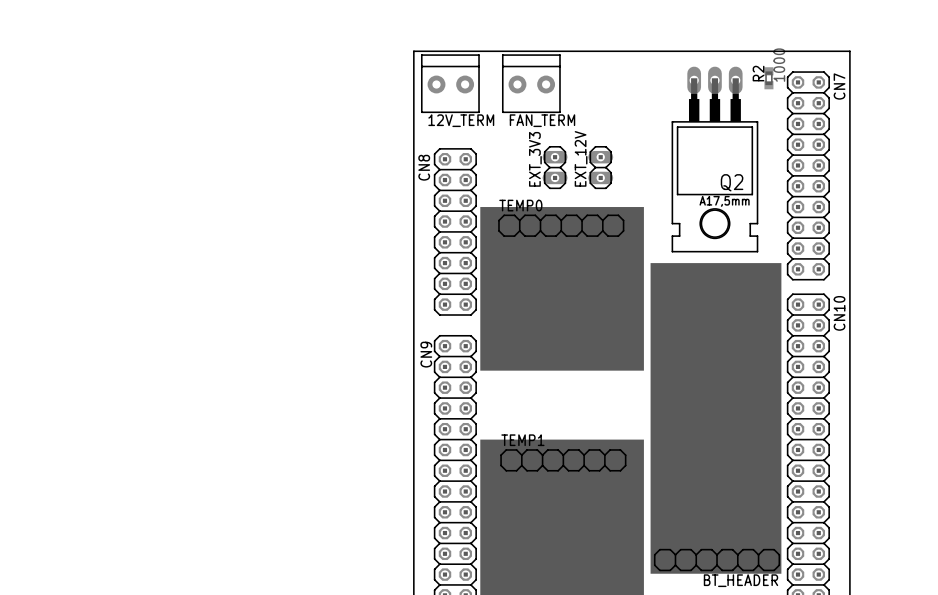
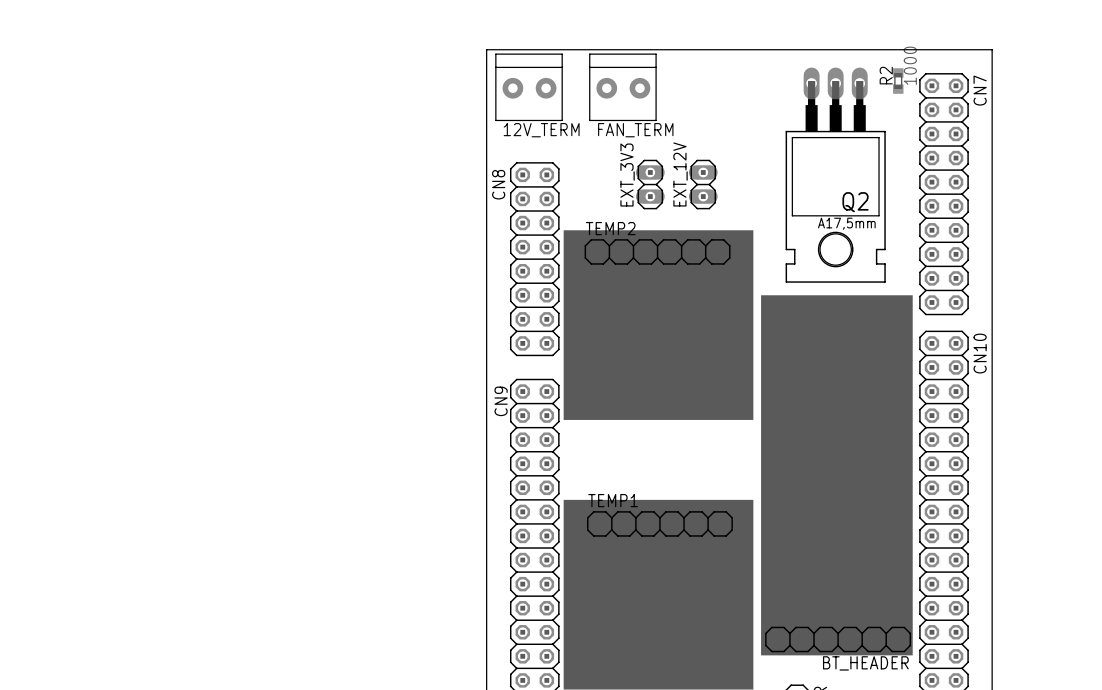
TEMP0 name: TEMP0 (520, 205) -> TEMP2 (610, 228)

